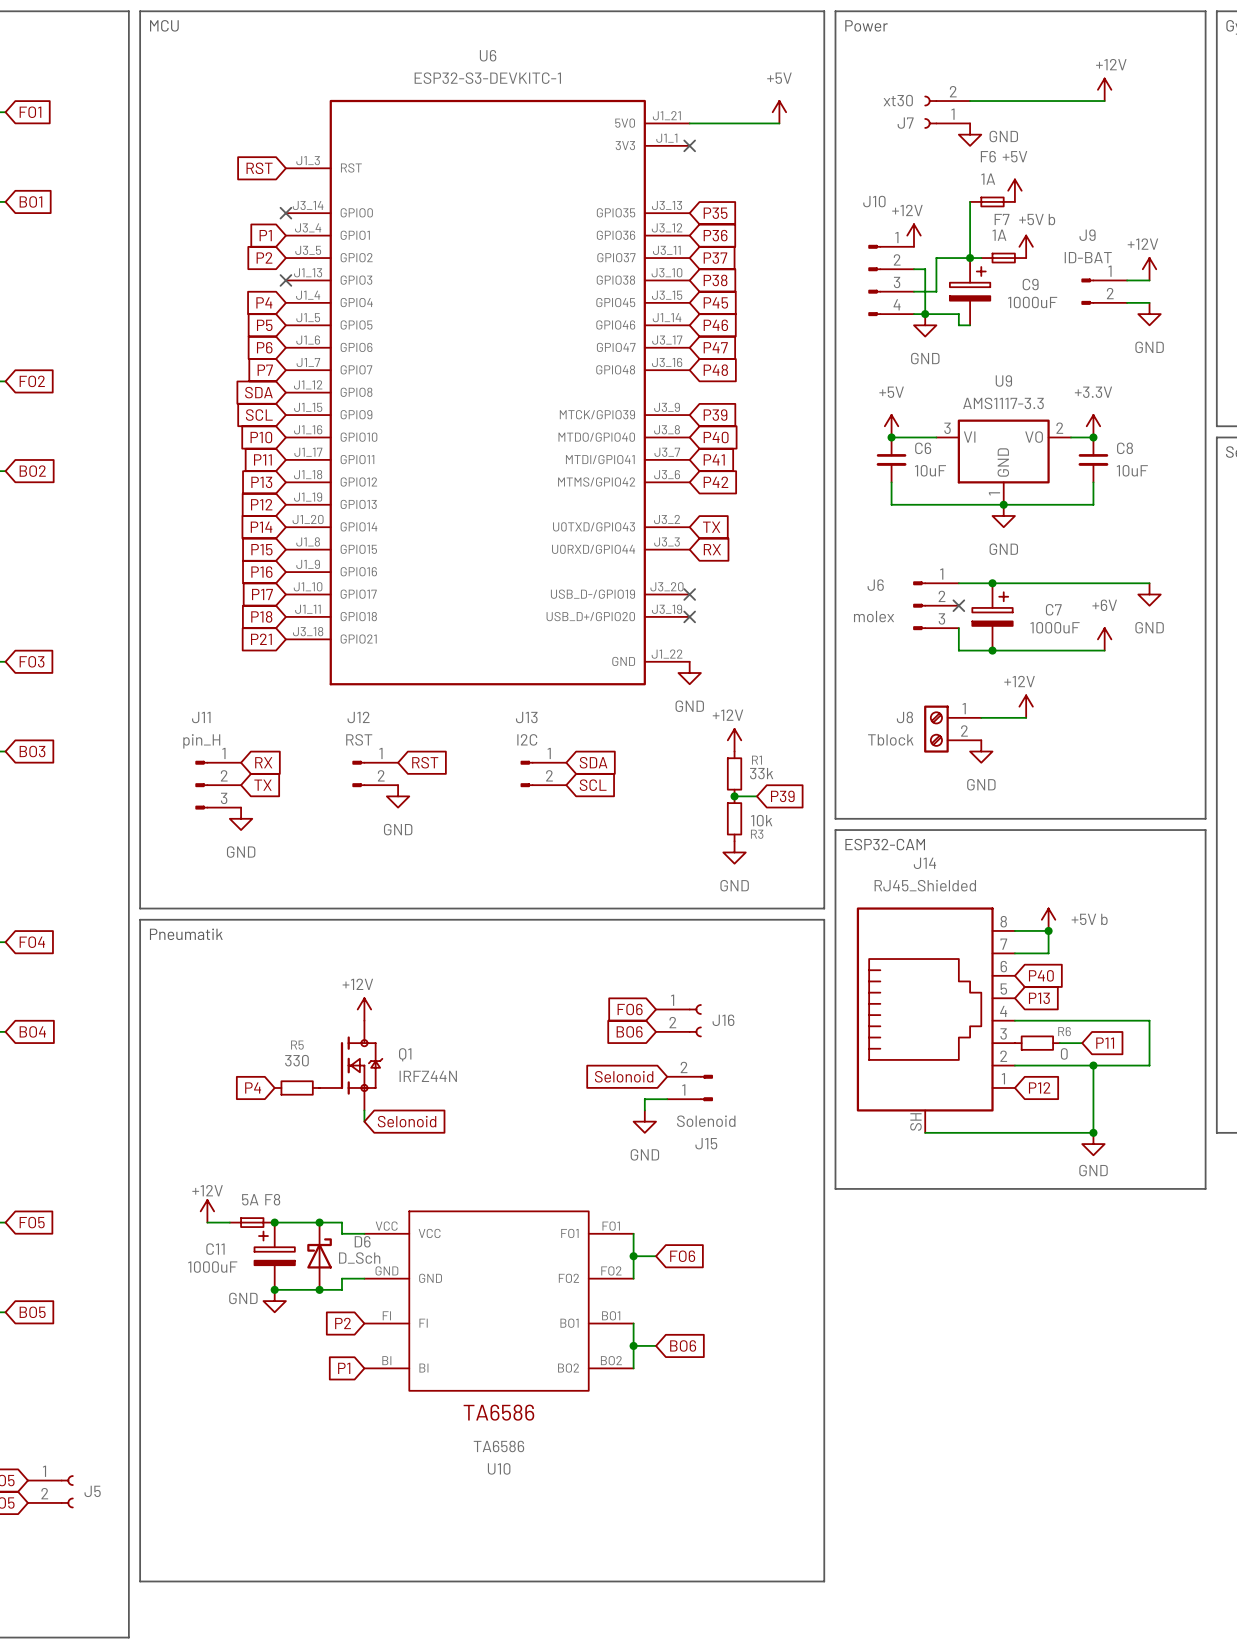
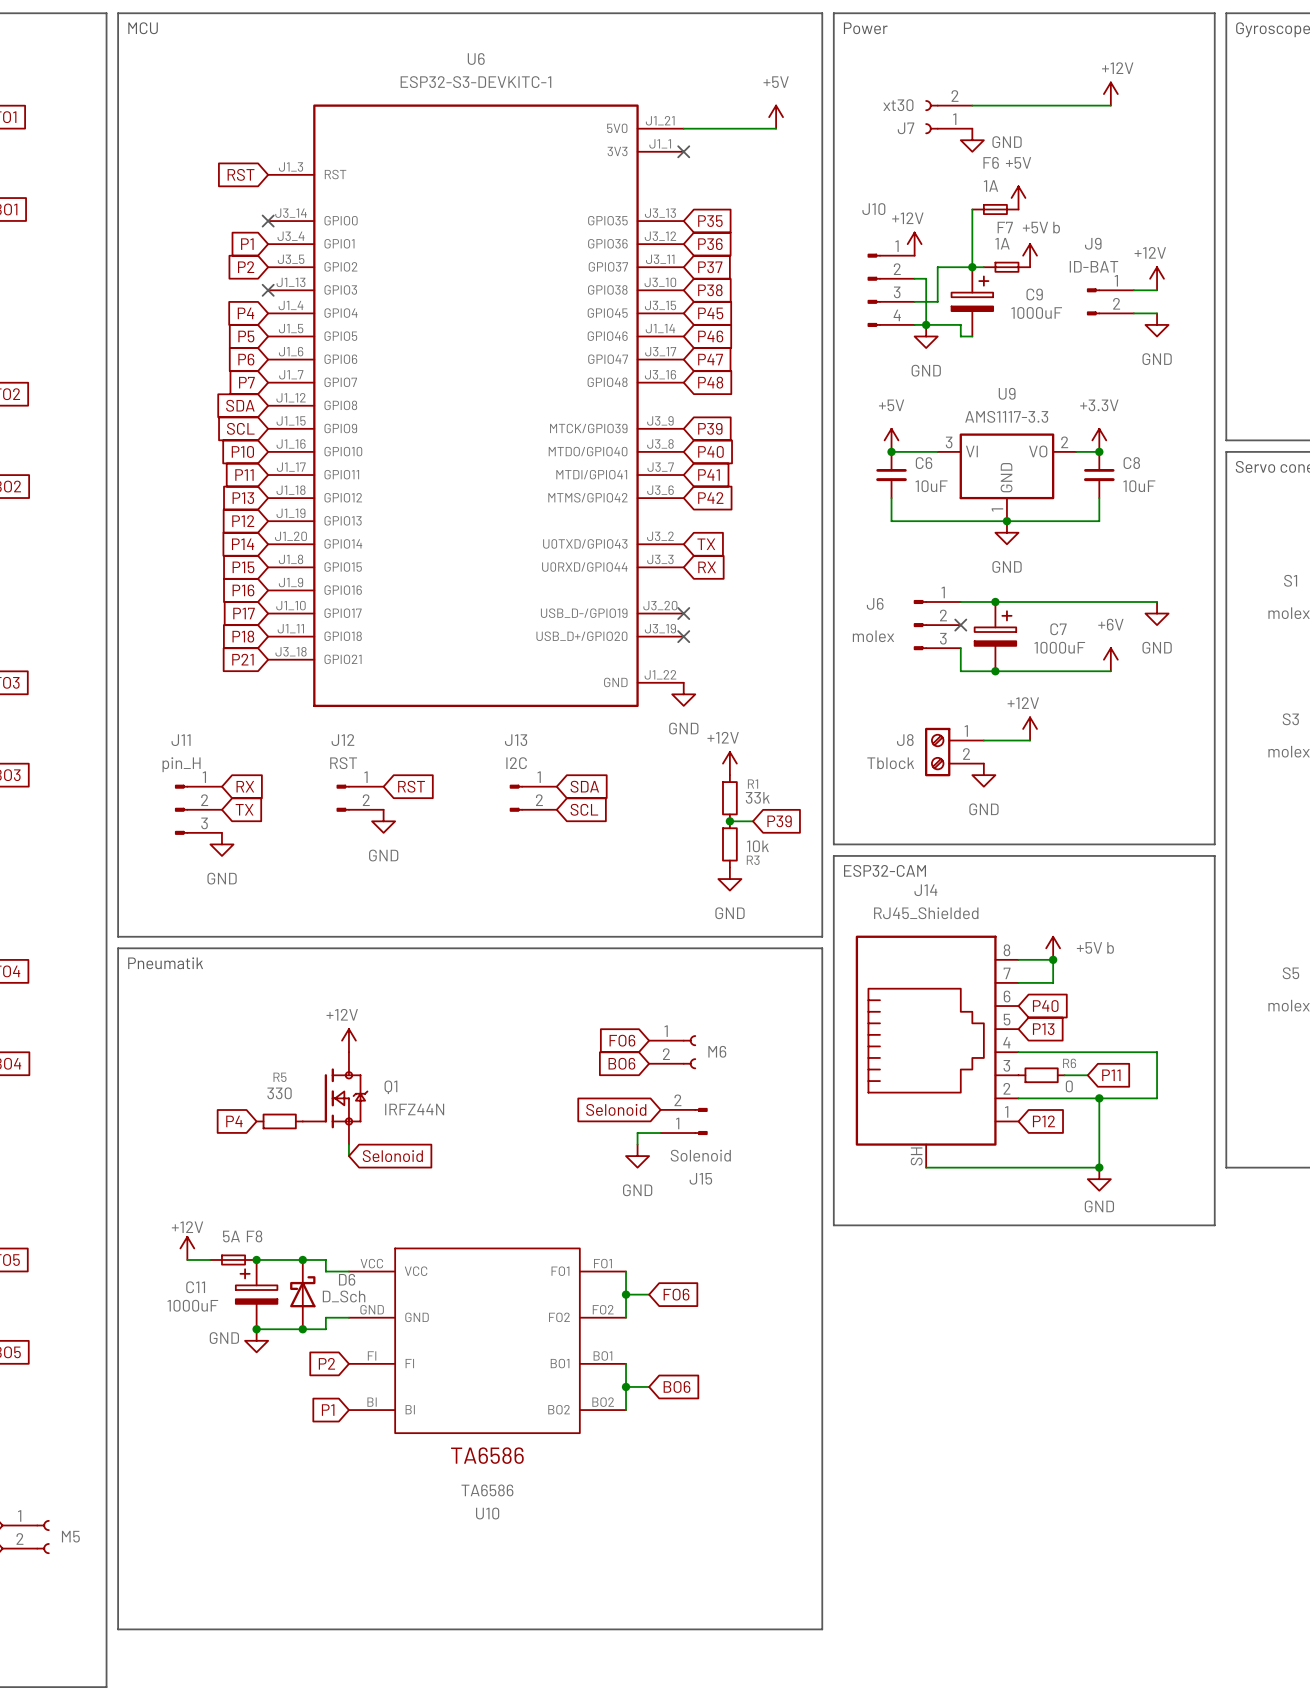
J16 name: J16 (723, 1020) -> M6 (717, 1051)
J5 name: J5 (92, 1491) -> M5 (70, 1536)

